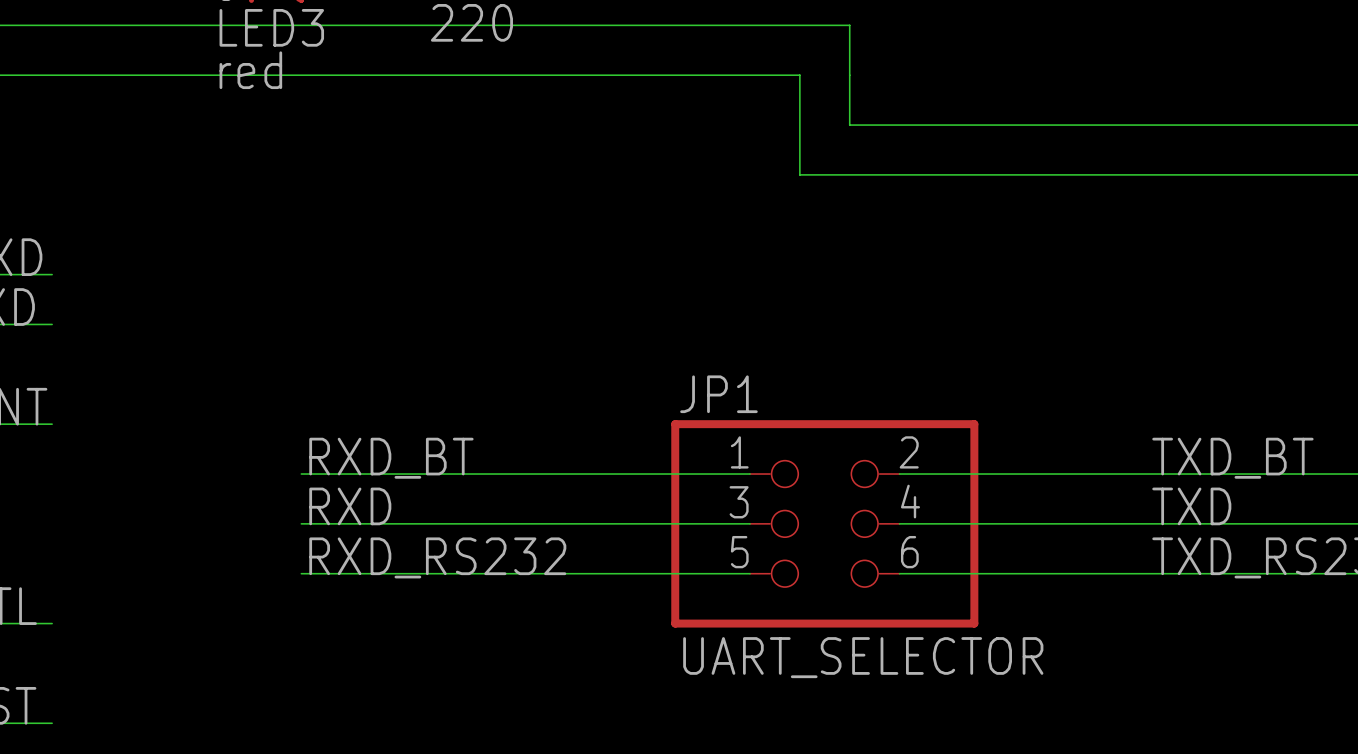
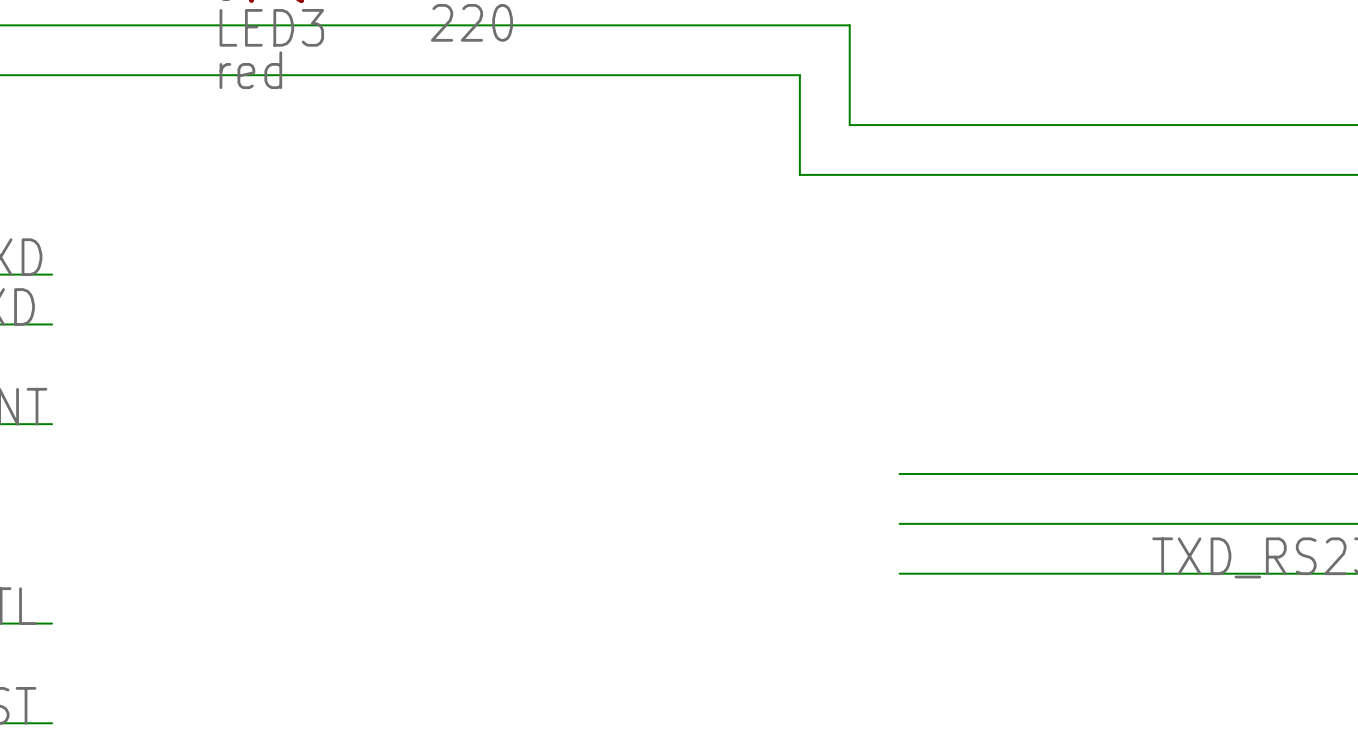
label: RXD_BT (391, 458) -> none
label: TXD_BT (1232, 458) -> none
wire: (301, 474) (750, 474) -> none
label: RXD (350, 506) -> none
label: TXD (1191, 506) -> none
wire: (301, 523) (750, 523) -> none
JP1: UART_SELECTOR (824, 523) -> none
label: RXD_RS232 (437, 557) -> none
wire: (301, 573) (750, 573) -> none

